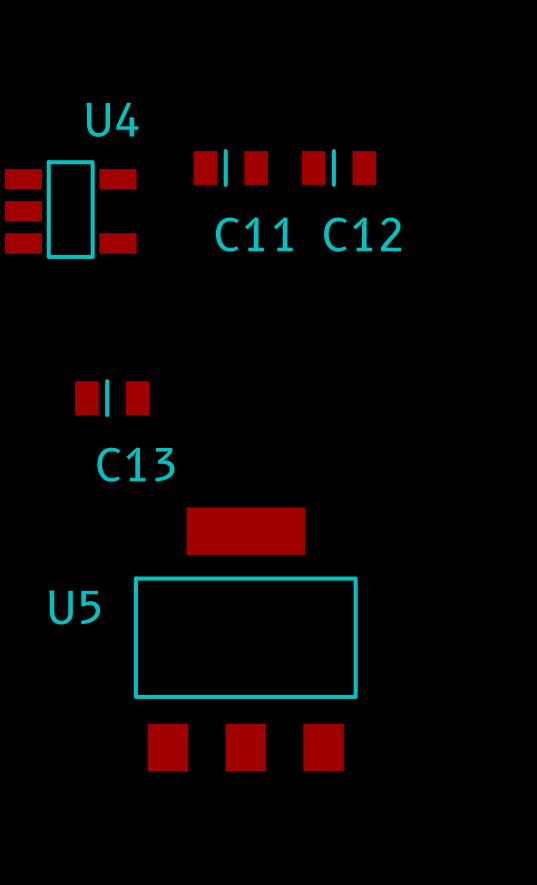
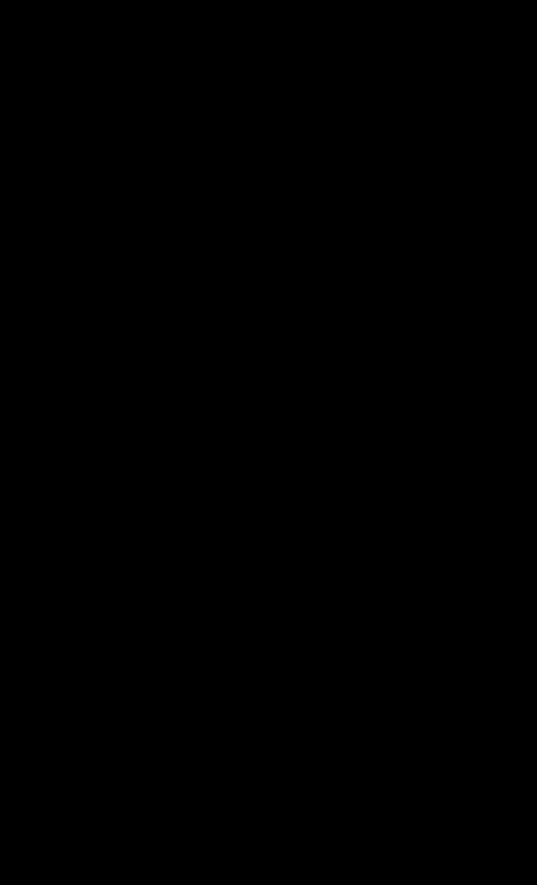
C11: (230, 167) -> none
C12: (338, 167) -> none
U4: (70, 209) -> none
C13: (112, 398) -> none
U5: (245, 639) -> none

